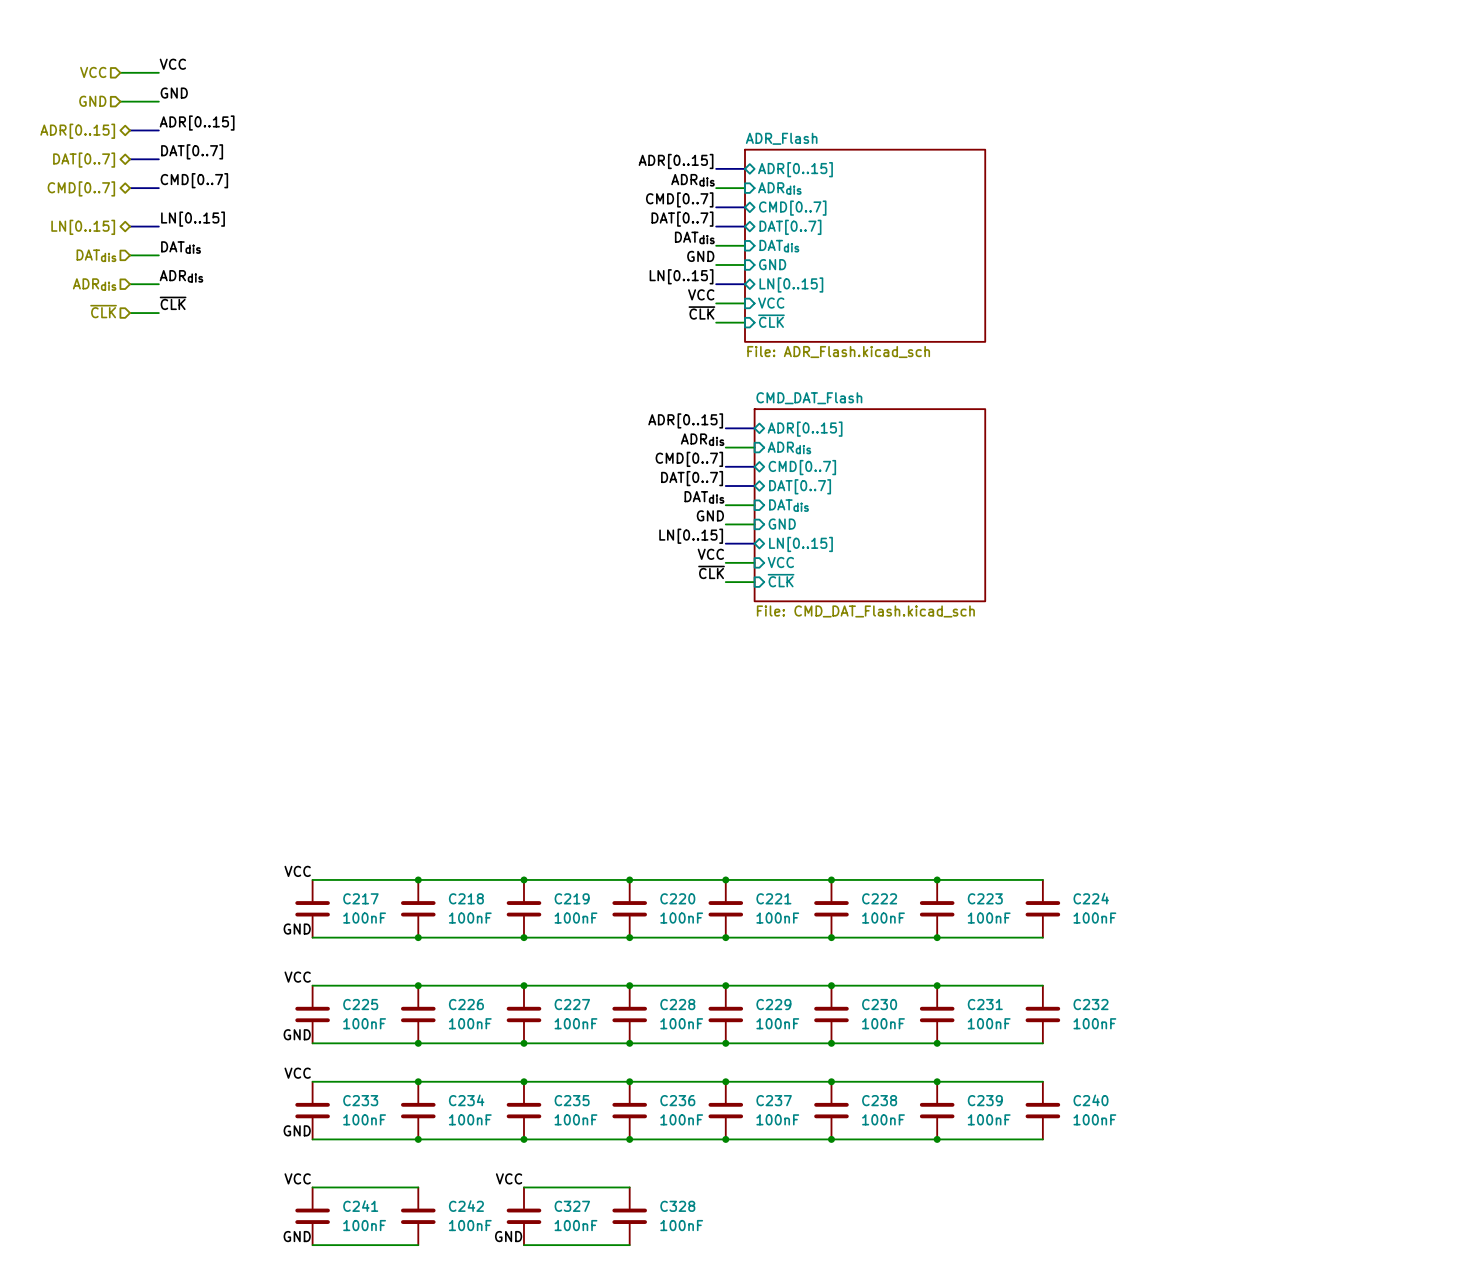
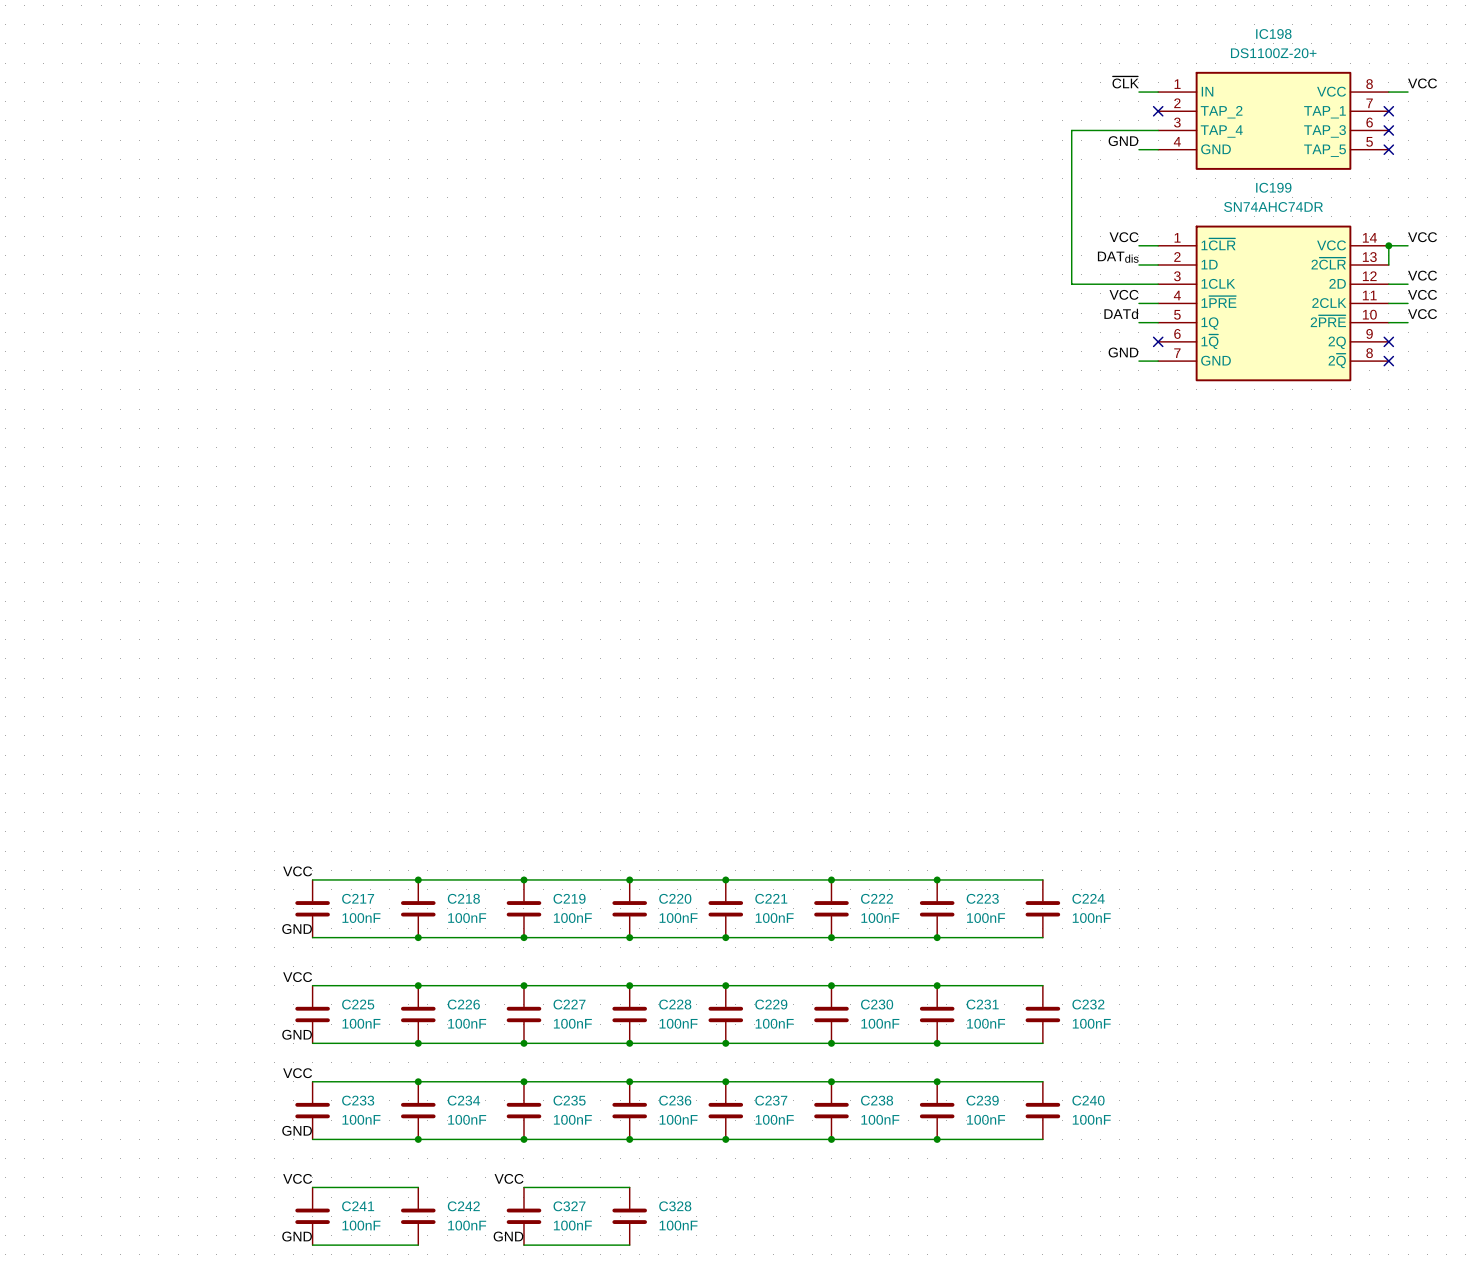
label: VCC (172, 64) -> none
hierarchical label: VCC (93, 72) -> none
wire: (120, 72) (158, 72) -> none
label: none -> ~{CLK} (1125, 82)
label: none -> VCC (1422, 83)
wire: none -> (1138, 92) (1158, 92)
wire: none -> (1388, 92) (1408, 92)
label: GND (174, 93) -> none
hierarchical label: GND (92, 101) -> none
wire: (120, 101) (158, 101) -> none
no-connect mark: none -> (1158, 111)
no-connect mark: none -> (1388, 111)
IC198: none -> DS1100Z-20+ (1273, 120)
label: ADR[0..15] (197, 123) -> none
bus: (130, 130) (158, 130) -> none
wire: none -> (1158, 130) (1071, 130) (1071, 284) (1158, 284)
no-connect mark: none -> (1388, 130)
hierarchical label: ADR[0..15] (77, 131) -> none
label: none -> GND (1123, 141)
wire: none -> (1138, 149) (1158, 149)
no-connect mark: none -> (1388, 149)
label: DAT[0..7] (192, 151) -> none
bus: (130, 159) (158, 159) -> none
hierarchical label: DAT[0..7] (84, 160) -> none
label: ADR[0..15] (676, 161) -> none
bus: (716, 168) (745, 168) -> none
sheet pin: ADR[0..15] (795, 169) -> none
label: CMD[0..7] (194, 180) -> none
label: ADRdis (692, 180) -> none
hierarchical label: CMD[0..7] (81, 188) -> none
bus: (130, 188) (158, 188) -> none
wire: (716, 188) (745, 188) -> none
sheet pin: ADRdis (779, 188) -> none
label: CMD[0..7] (679, 199) -> none
bus: (716, 207) (745, 207) -> none
sheet pin: CMD[0..7] (792, 208) -> none
label: LN[0..15] (193, 219) -> none
label: DAT[0..7] (682, 219) -> none
bus: (130, 226) (158, 226) -> none
bus: (716, 226) (745, 226) -> none
hierarchical label: LN[0..15] (83, 227) -> none
sheet pin: DAT[0..7] (790, 227) -> none
label: DATdis (694, 237) -> none
label: none -> VCC (1123, 237)
label: none -> VCC (1422, 237)
wire: (716, 245) (745, 245) -> none
sheet ADR_Flash: File: ADR_Flash.kicad_sch (865, 245) -> none
wire: none -> (1138, 245) (1158, 245)
junction: none -> (1388, 245)
wire: none -> (1408, 245) (1388, 245) (1388, 265)
sheet pin: DATdis (779, 246) -> none
label: DATdis (181, 247) -> none
hierarchical label: DATdis (96, 255) -> none
wire: (130, 255) (158, 255) -> none
label: GND (700, 256) -> none
label: none -> DATdis (1118, 257)
sheet pin: GND (772, 264) -> none
wire: (716, 265) (745, 265) -> none
wire: none -> (1138, 265) (1158, 265)
label: none -> VCC (1422, 275)
label: ADRdis (181, 276) -> none
label: LN[0..15] (681, 276) -> none
hierarchical label: ADRdis (94, 284) -> none
wire: (130, 284) (158, 284) -> none
bus: (716, 284) (745, 284) -> none
wire: none -> (1388, 284) (1408, 284)
sheet pin: LN[0..15] (791, 285) -> none
label: VCC (701, 294) -> none
label: none -> VCC (1123, 294)
label: none -> VCC (1422, 294)
label: ~{CLK} (173, 303) -> none
wire: (716, 303) (745, 303) -> none
sheet pin: VCC (771, 303) -> none
wire: none -> (1138, 303) (1158, 303)
IC199: none -> SN74AHC74DR (1273, 303)
wire: none -> (1388, 303) (1408, 303)
hierarchical label: ~{CLK} (103, 311) -> none
label: ~{CLK} (701, 312) -> none
wire: (130, 313) (158, 313) -> none
label: none -> DATd (1121, 313)
label: none -> VCC (1422, 314)
sheet pin: ~{CLK} (771, 321) -> none
wire: (716, 322) (745, 322) -> none
wire: none -> (1138, 322) (1158, 322)
wire: none -> (1388, 322) (1408, 322)
no-connect mark: none -> (1158, 341)
no-connect mark: none -> (1388, 341)
label: none -> GND (1123, 352)
wire: none -> (1138, 361) (1158, 361)
no-connect mark: none -> (1388, 361)
label: ADR[0..15] (685, 420) -> none
bus: (725, 428) (754, 428) -> none
sheet pin: ADR[0..15] (805, 429) -> none
label: ADRdis (702, 439) -> none
wire: (725, 447) (754, 447) -> none
sheet pin: ADRdis (789, 447) -> none
label: CMD[0..7] (689, 459) -> none
bus: (725, 466) (754, 466) -> none
sheet pin: CMD[0..7] (802, 467) -> none
label: DAT[0..7] (692, 478) -> none
bus: (725, 486) (754, 486) -> none
sheet pin: DAT[0..7] (800, 486) -> none
label: DATdis (704, 497) -> none
wire: (725, 505) (754, 505) -> none
sheet pin: DATdis (788, 505) -> none
sheet CMD_DAT_Flash: File: CMD_DAT_Flash.kicad_sch (869, 505) -> none
label: GND (710, 515) -> none
wire: (725, 524) (754, 524) -> none
sheet pin: GND (782, 524) -> none
label: LN[0..15] (691, 536) -> none
bus: (725, 543) (754, 543) -> none
sheet pin: LN[0..15] (800, 544) -> none
label: VCC (710, 554) -> none
wire: (725, 562) (754, 562) -> none
sheet pin: VCC (780, 562) -> none
label: ~{CLK} (711, 572) -> none
sheet pin: ~{CLK} (781, 580) -> none
wire: (725, 582) (754, 582) -> none

